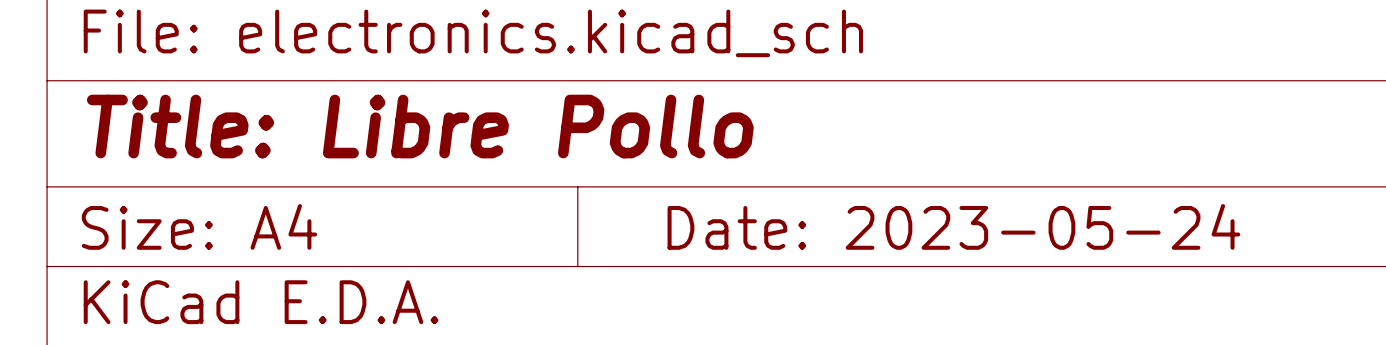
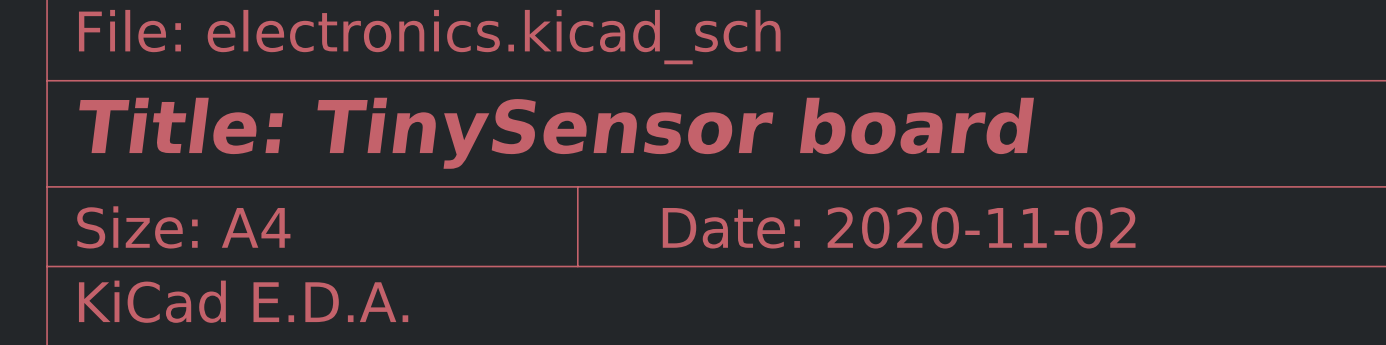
title block: Title: Libre Pollo (420, 126) -> Title: TinySensor board (556, 133)
title block: Date: 2023-05-24 (953, 226) -> Date: 2020-11-02 (899, 227)

